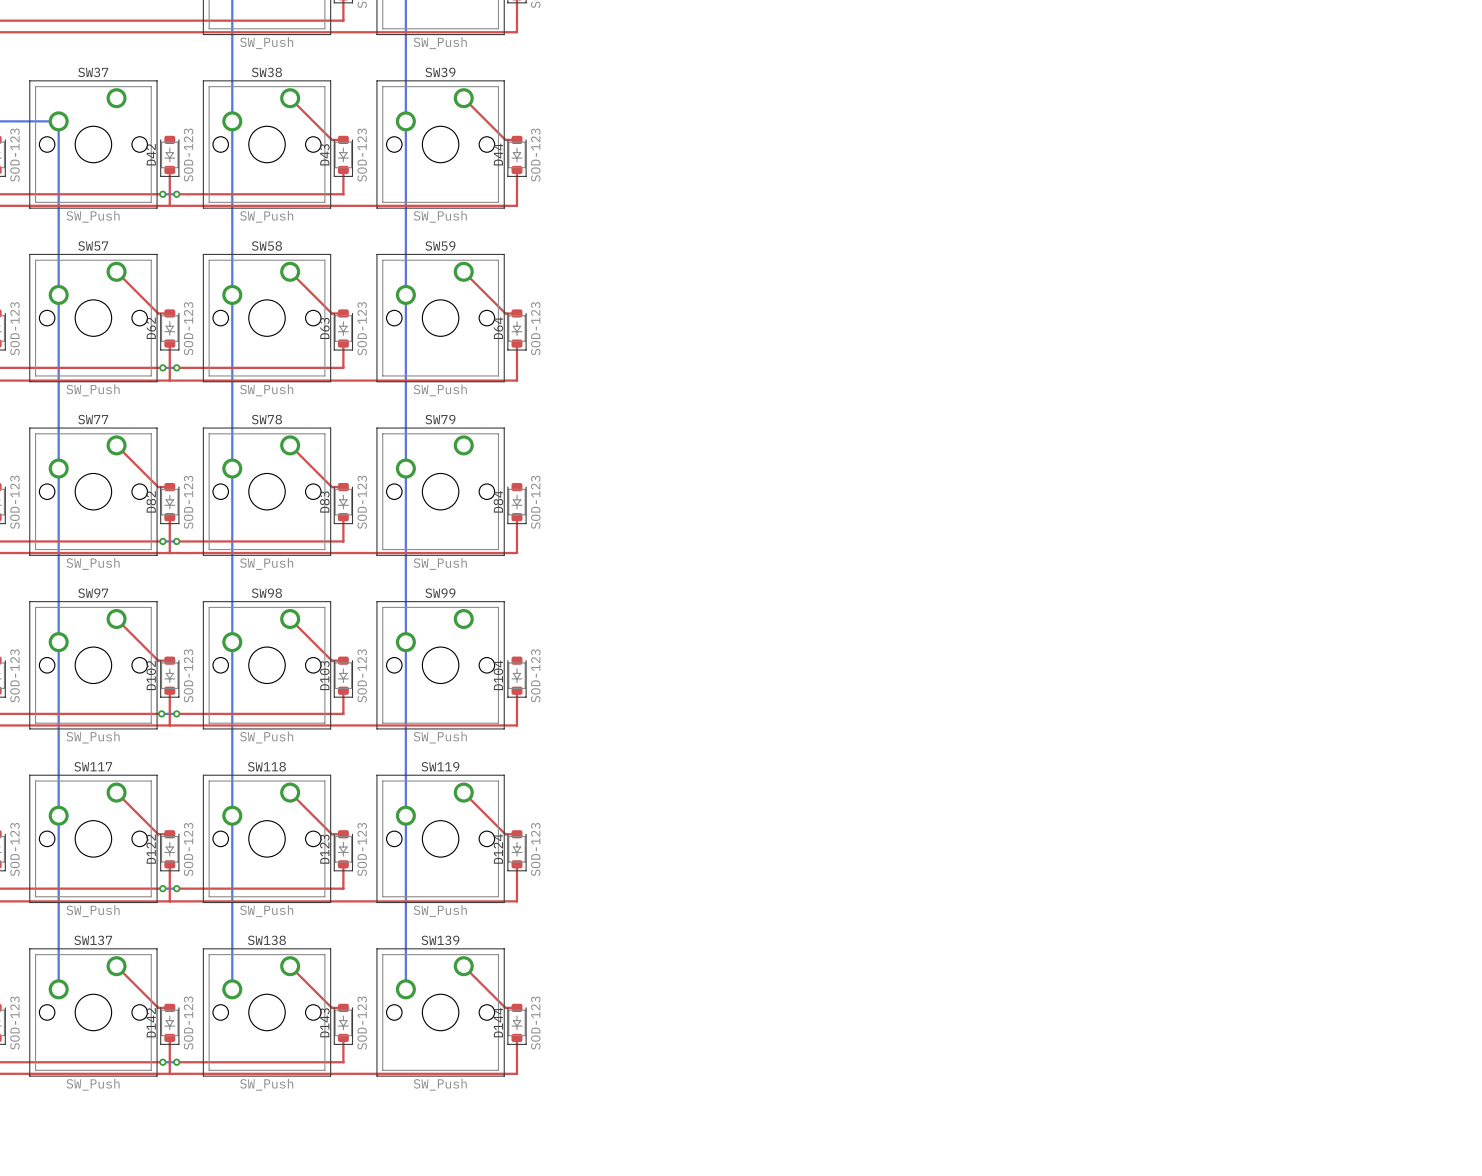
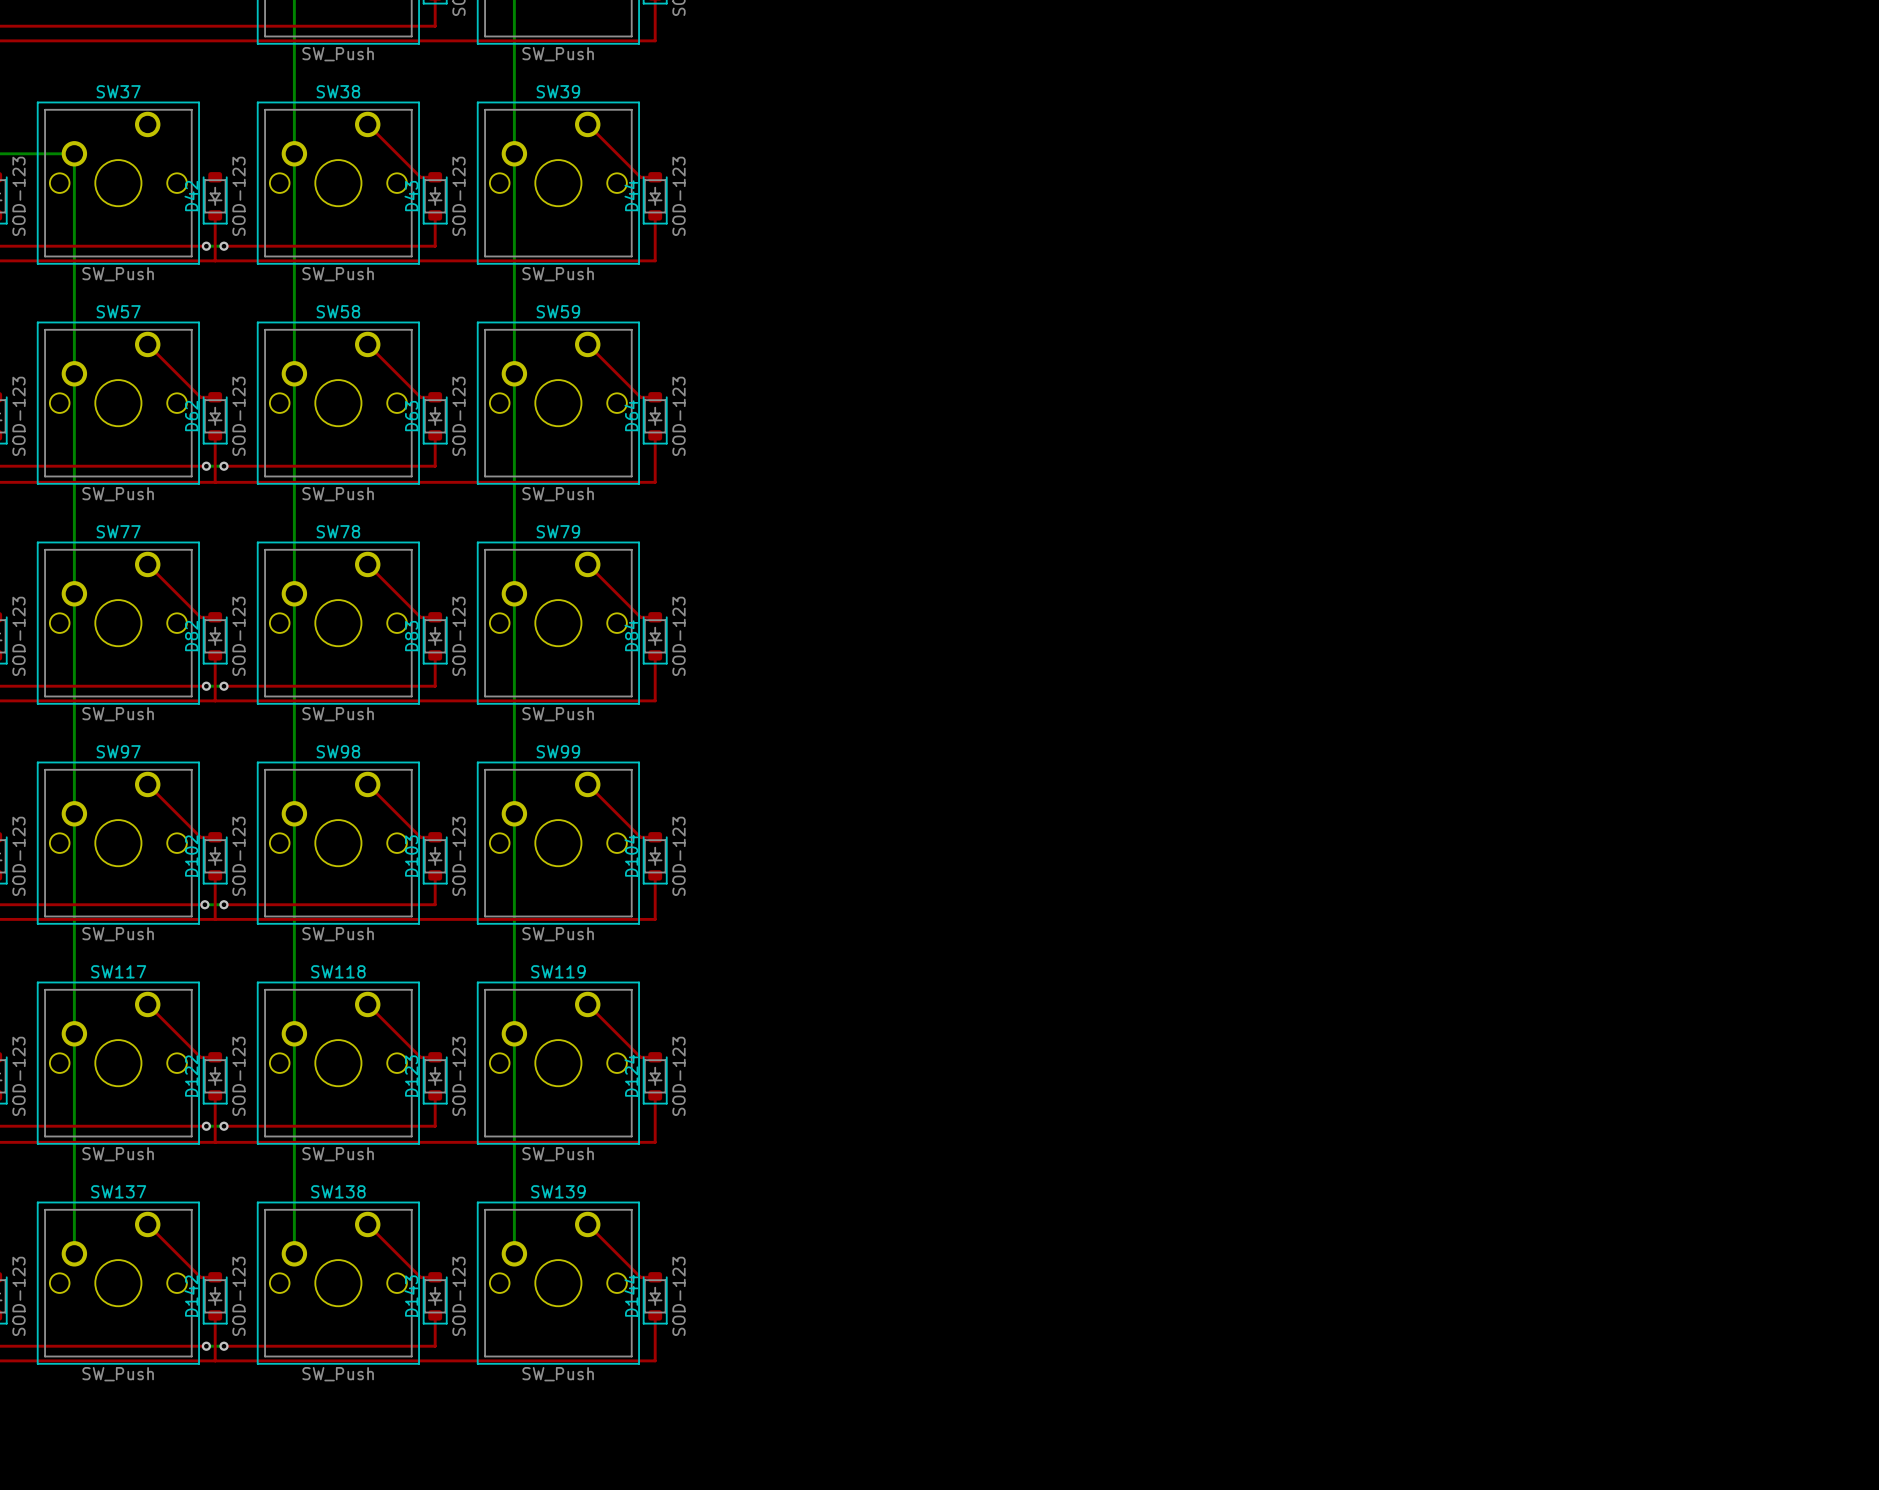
top track: none -> (587, 564) (640, 617) (655, 617)
top track: none -> (587, 784) (640, 837) (655, 837)

